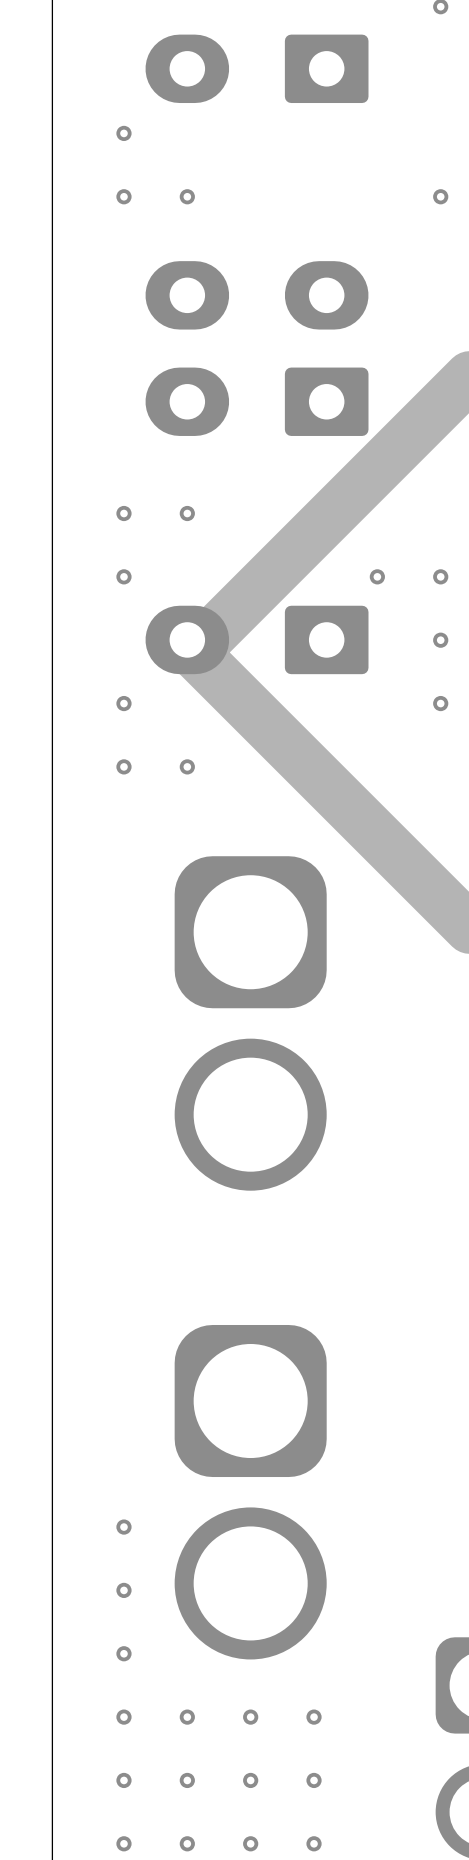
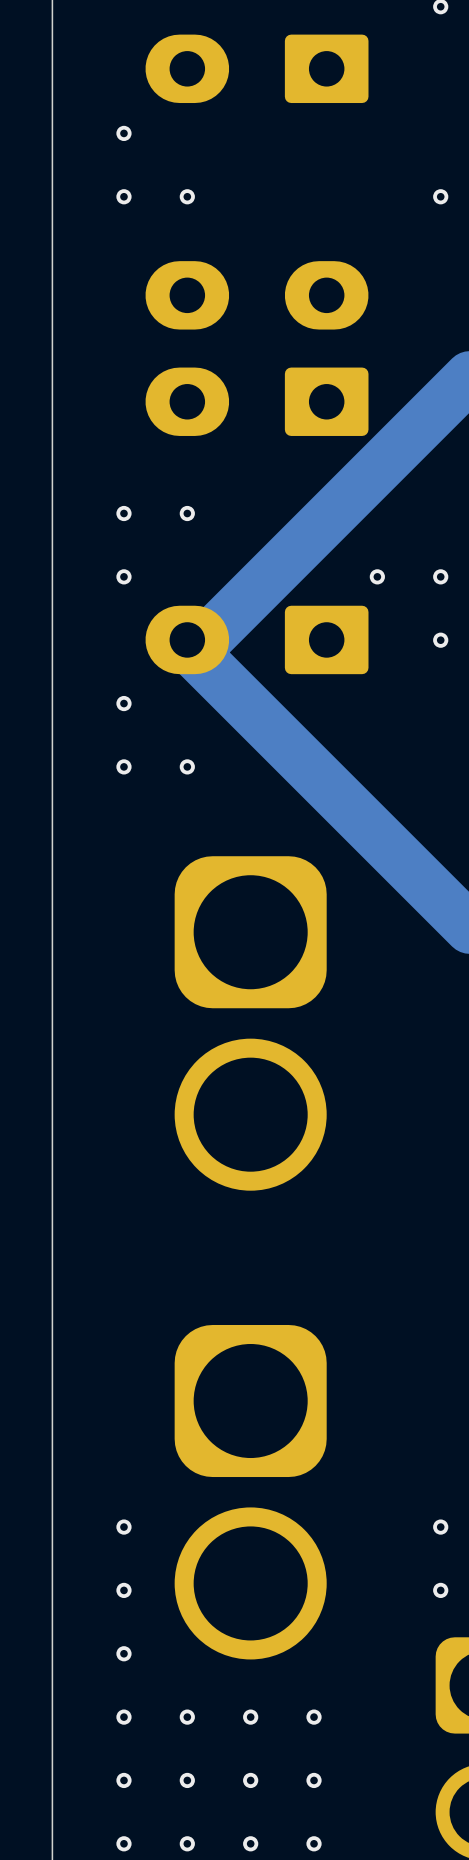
via: (440, 703) -> none
via: none -> (440, 1527)
via: none -> (440, 1590)

